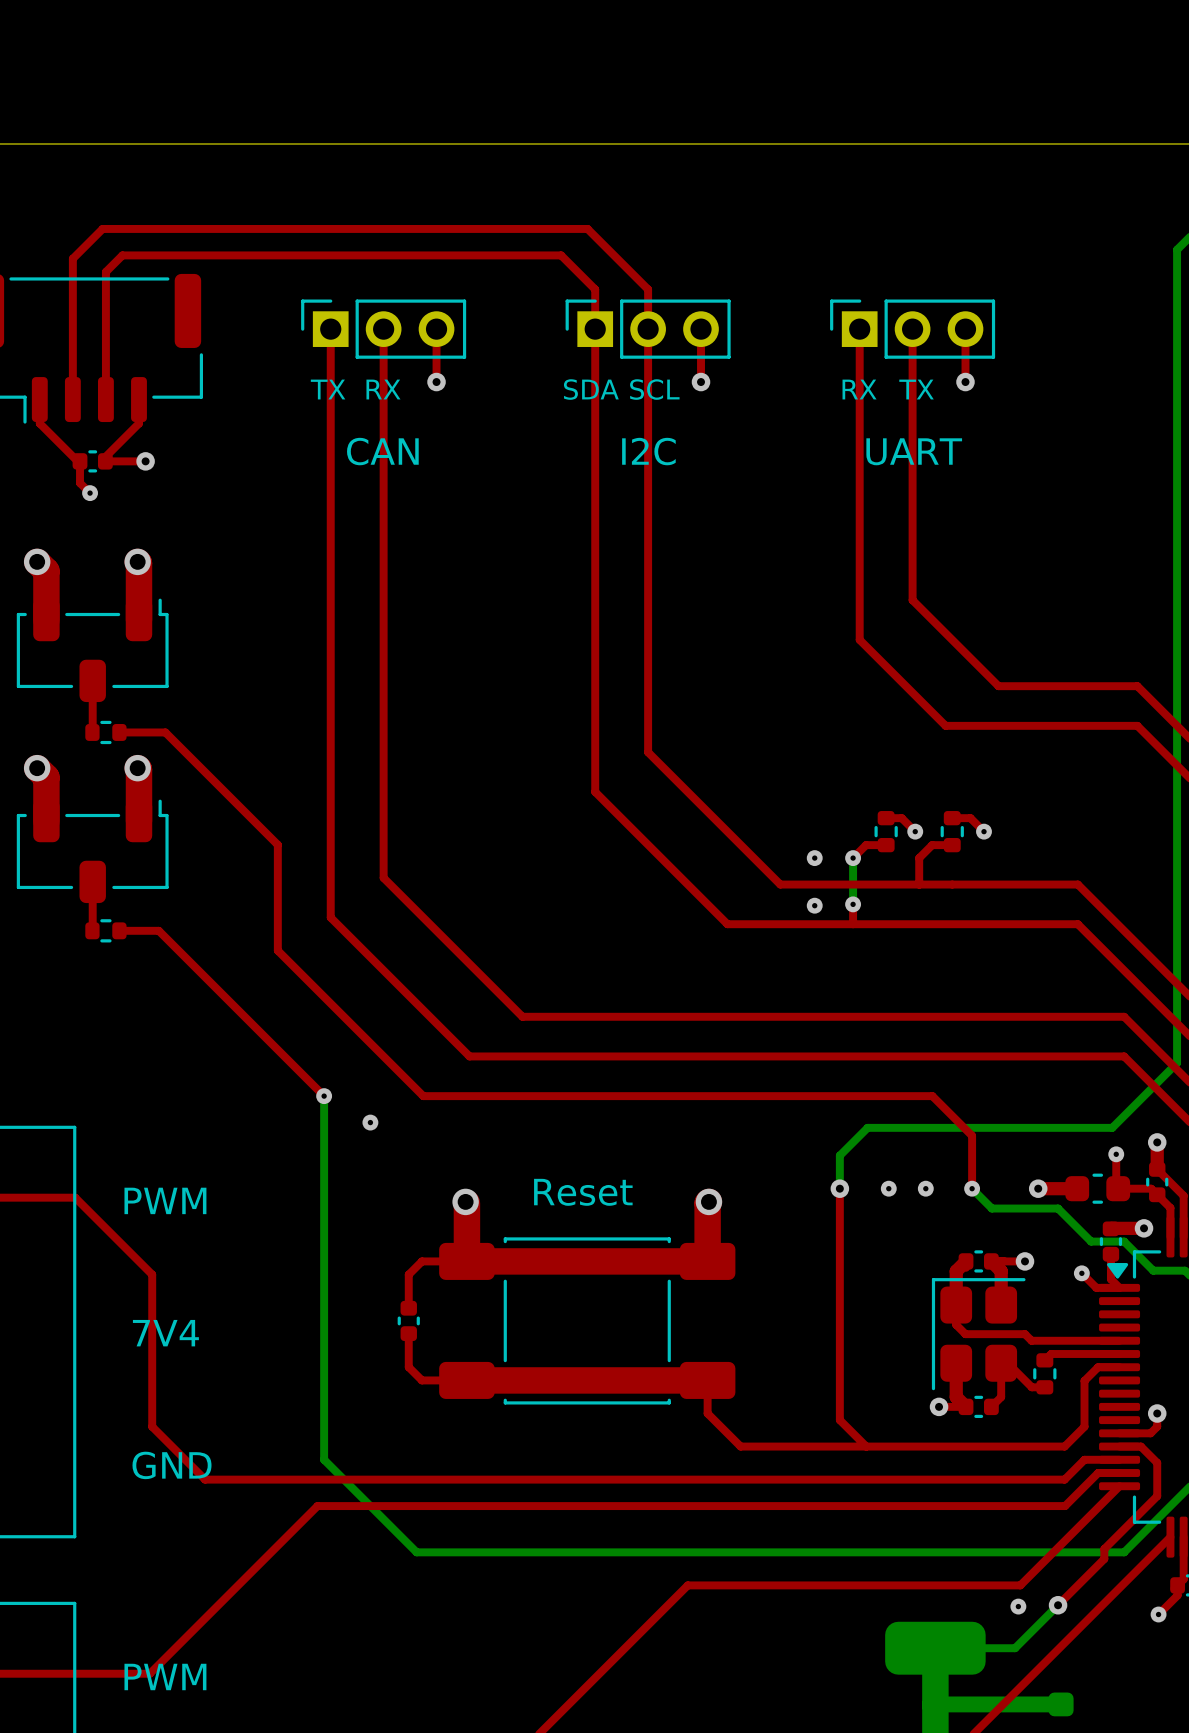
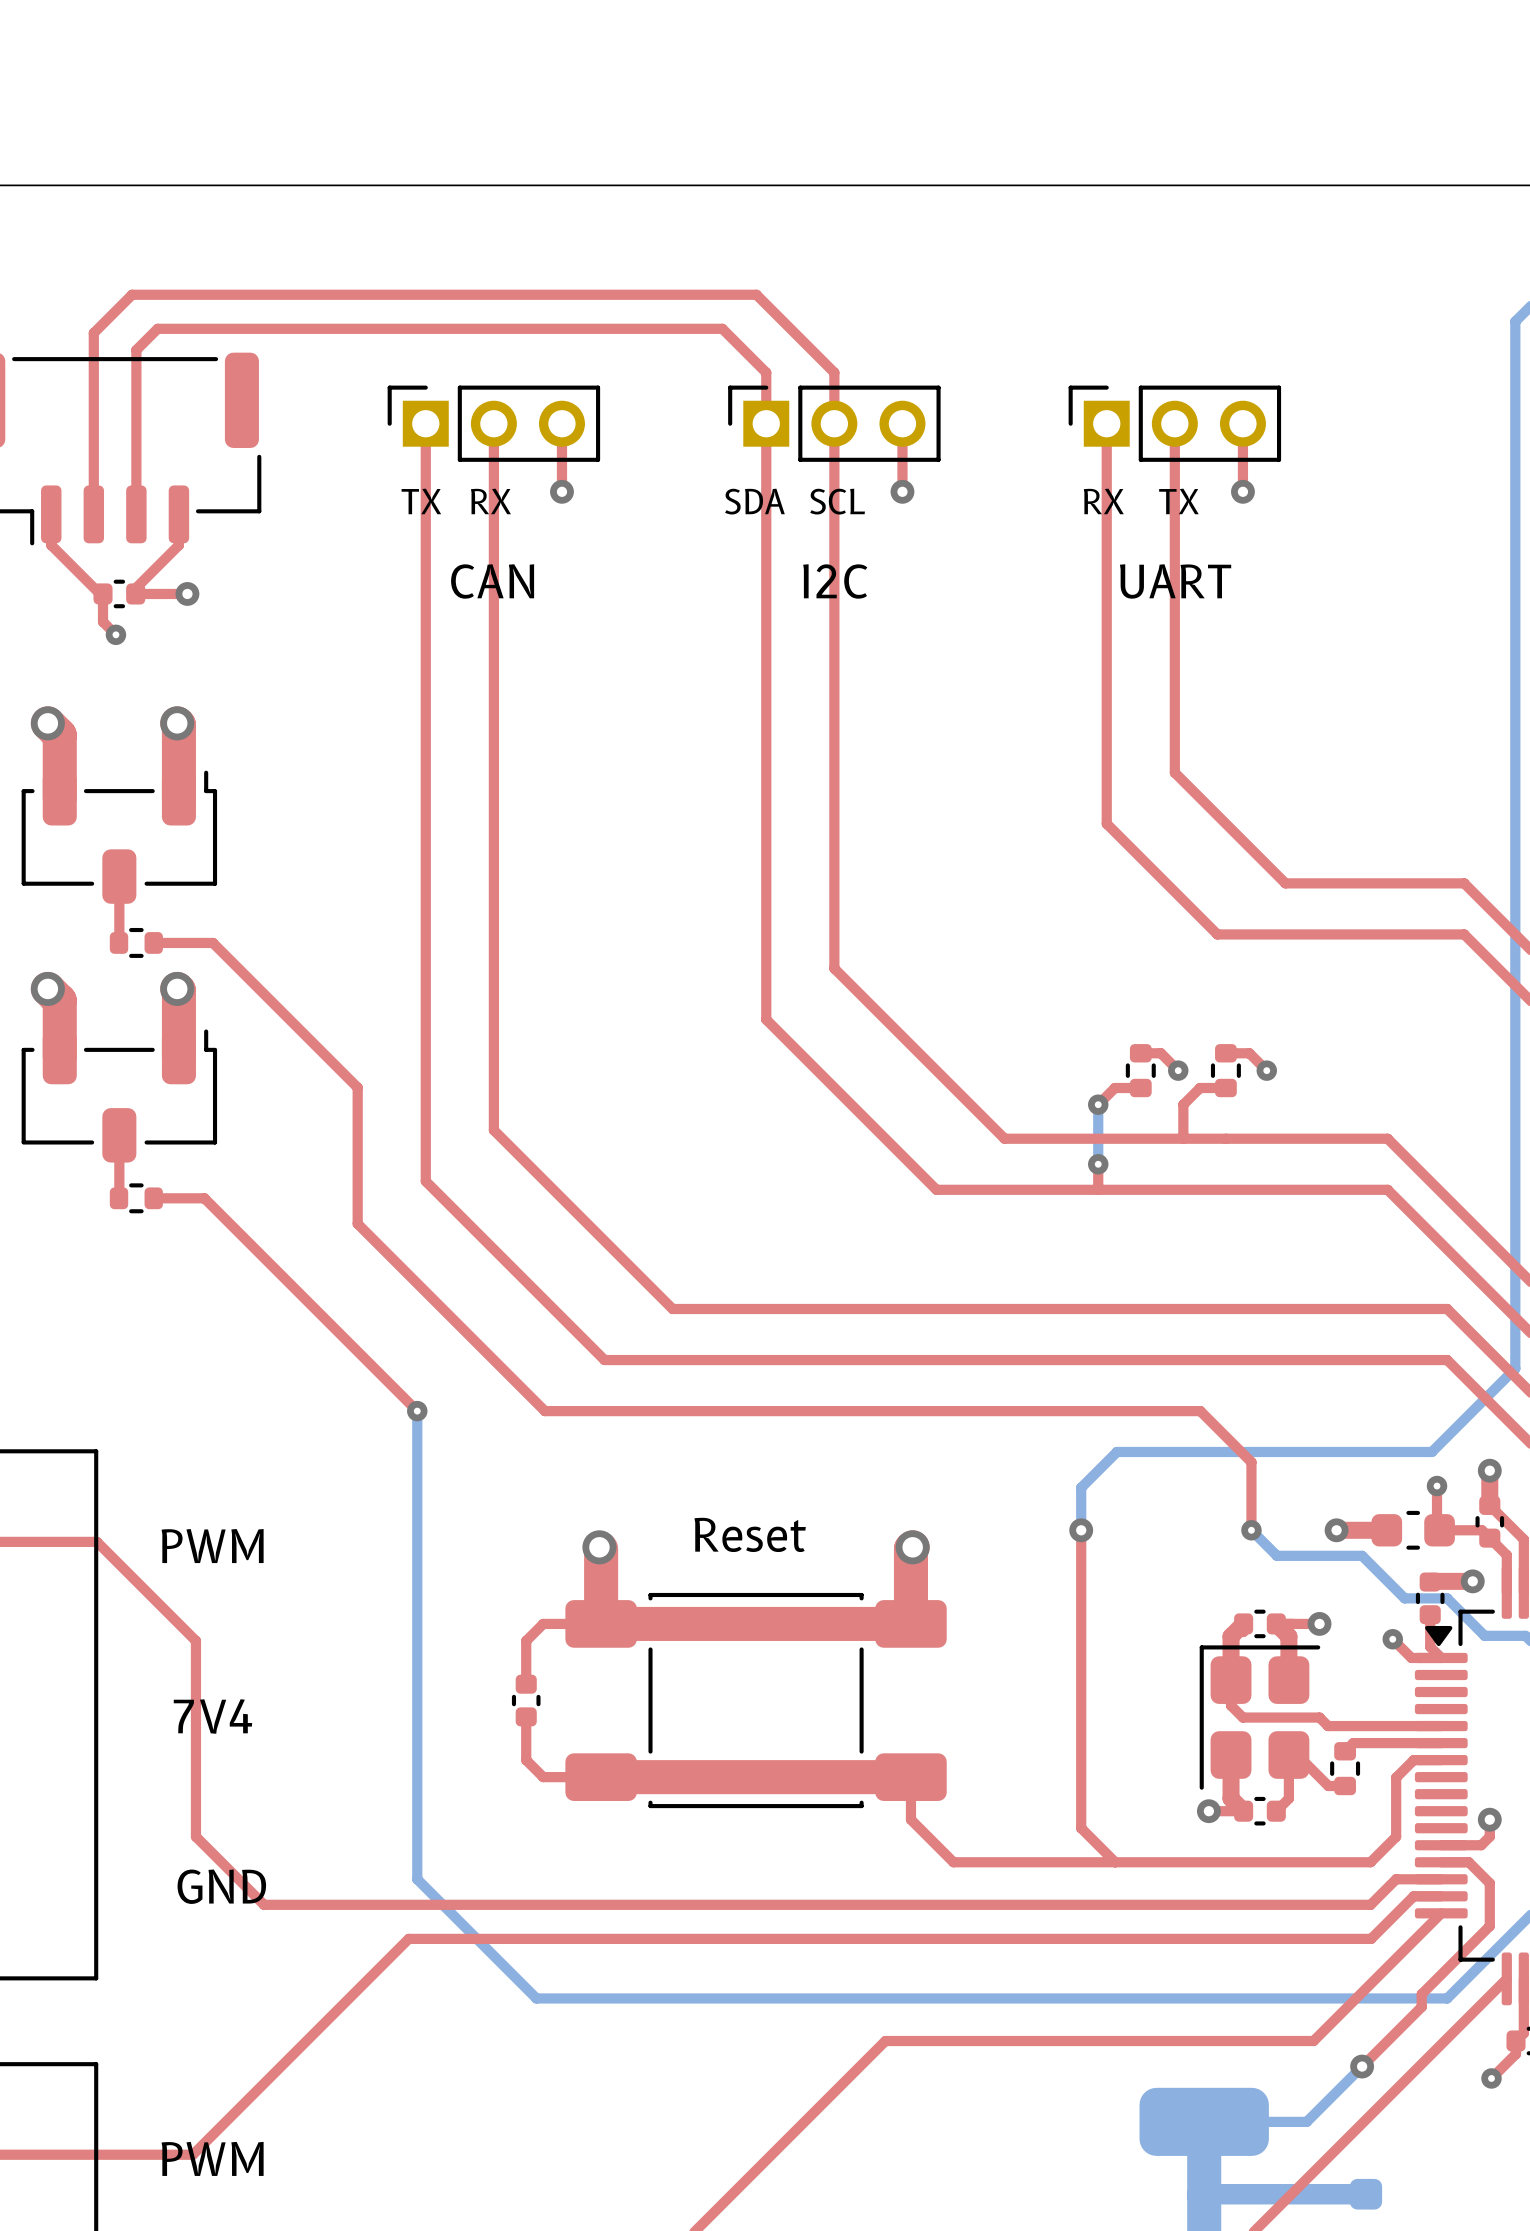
via: (814, 858) -> none
via: (814, 905) -> none
via: (370, 1122) -> none
via: (888, 1188) -> none
via: (925, 1188) -> none
via: (1018, 1606) -> none

